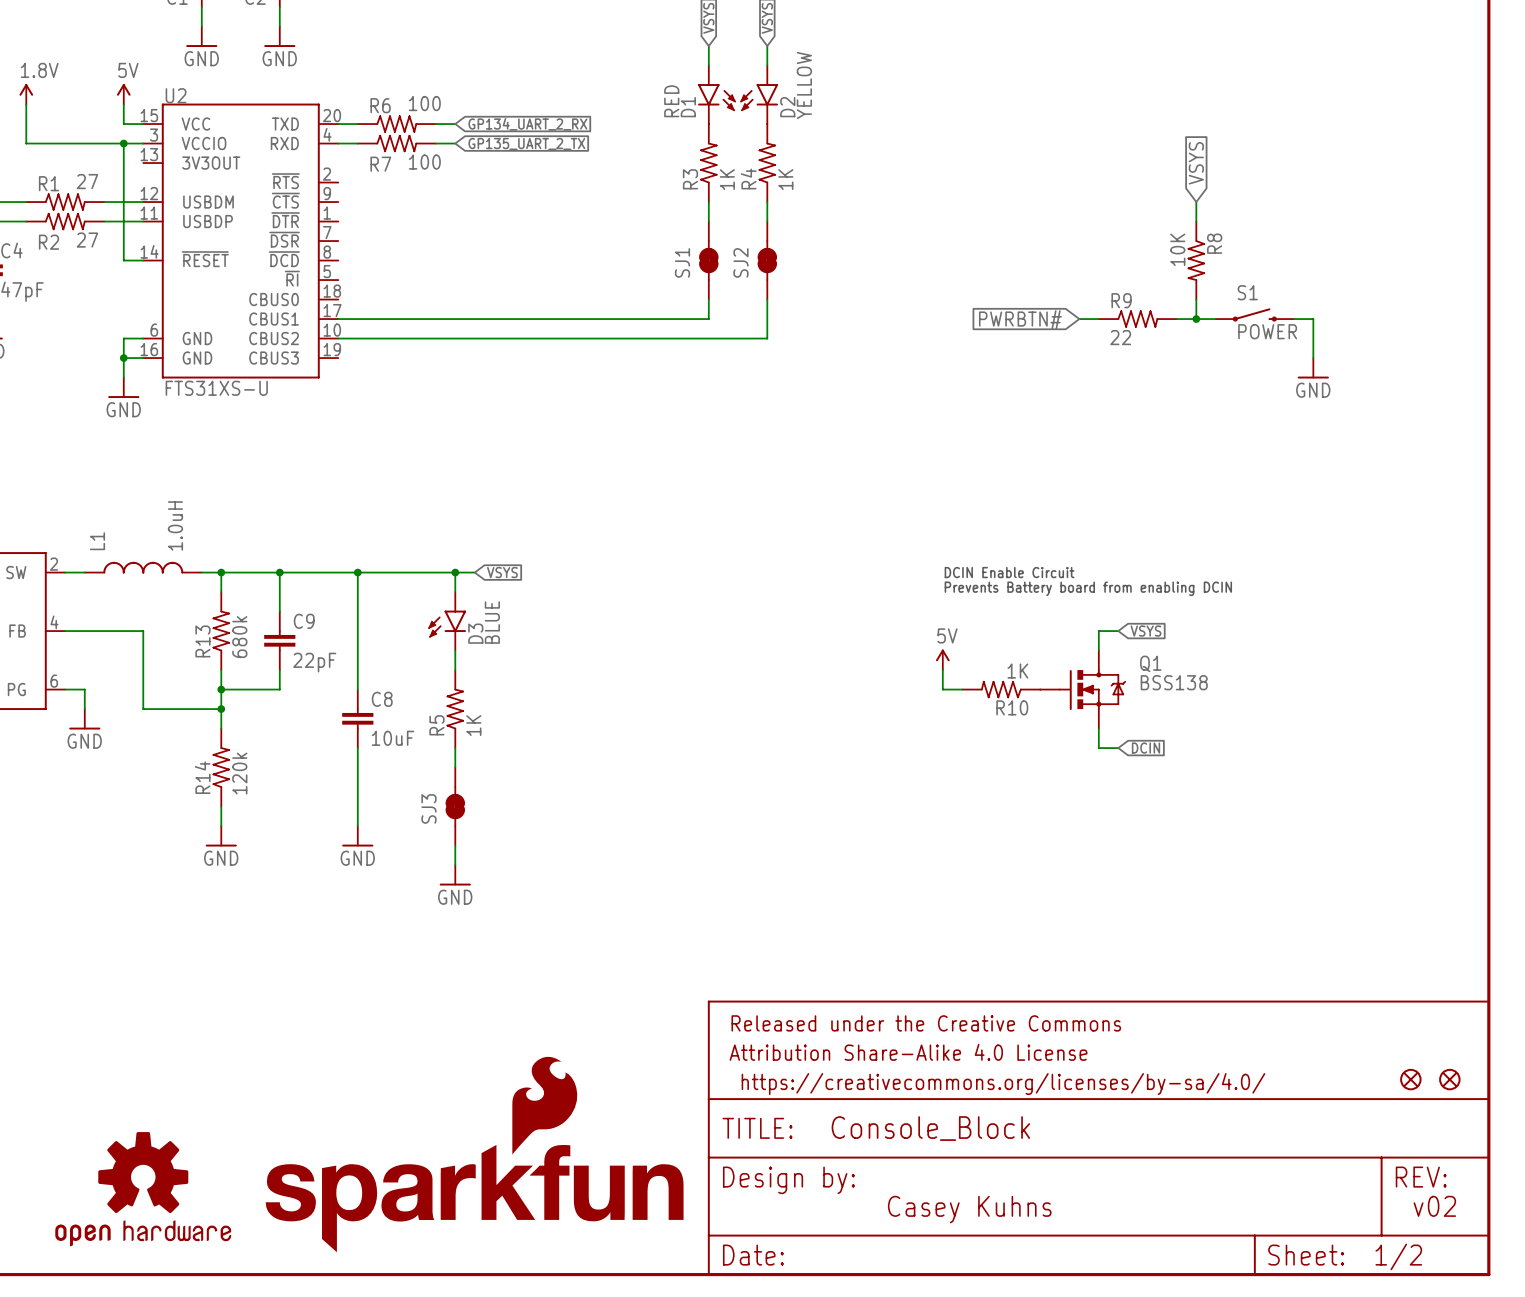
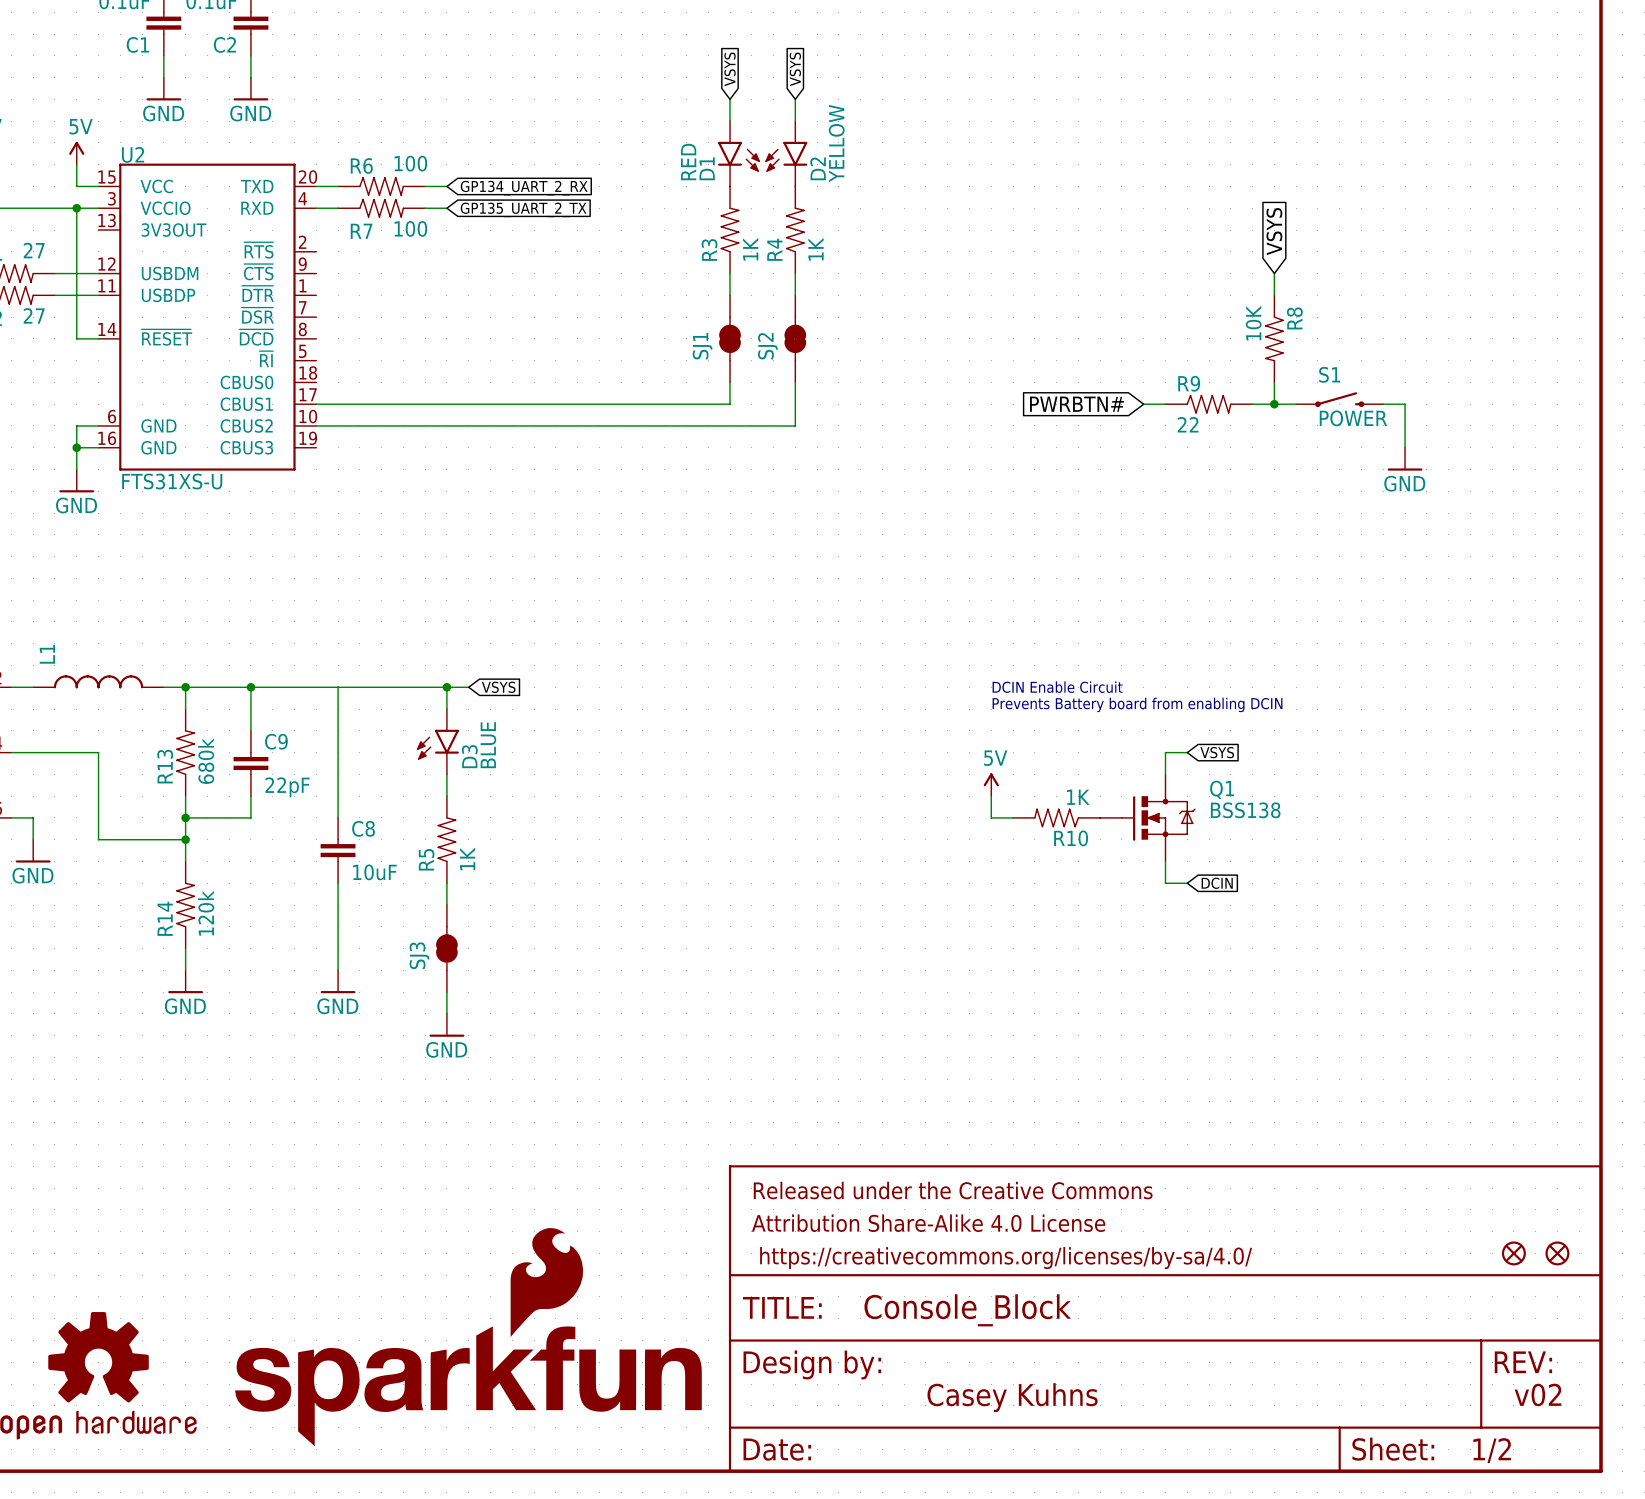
L1 value: 1.0uH (175, 526) -> none
junction: (357, 572) -> none

